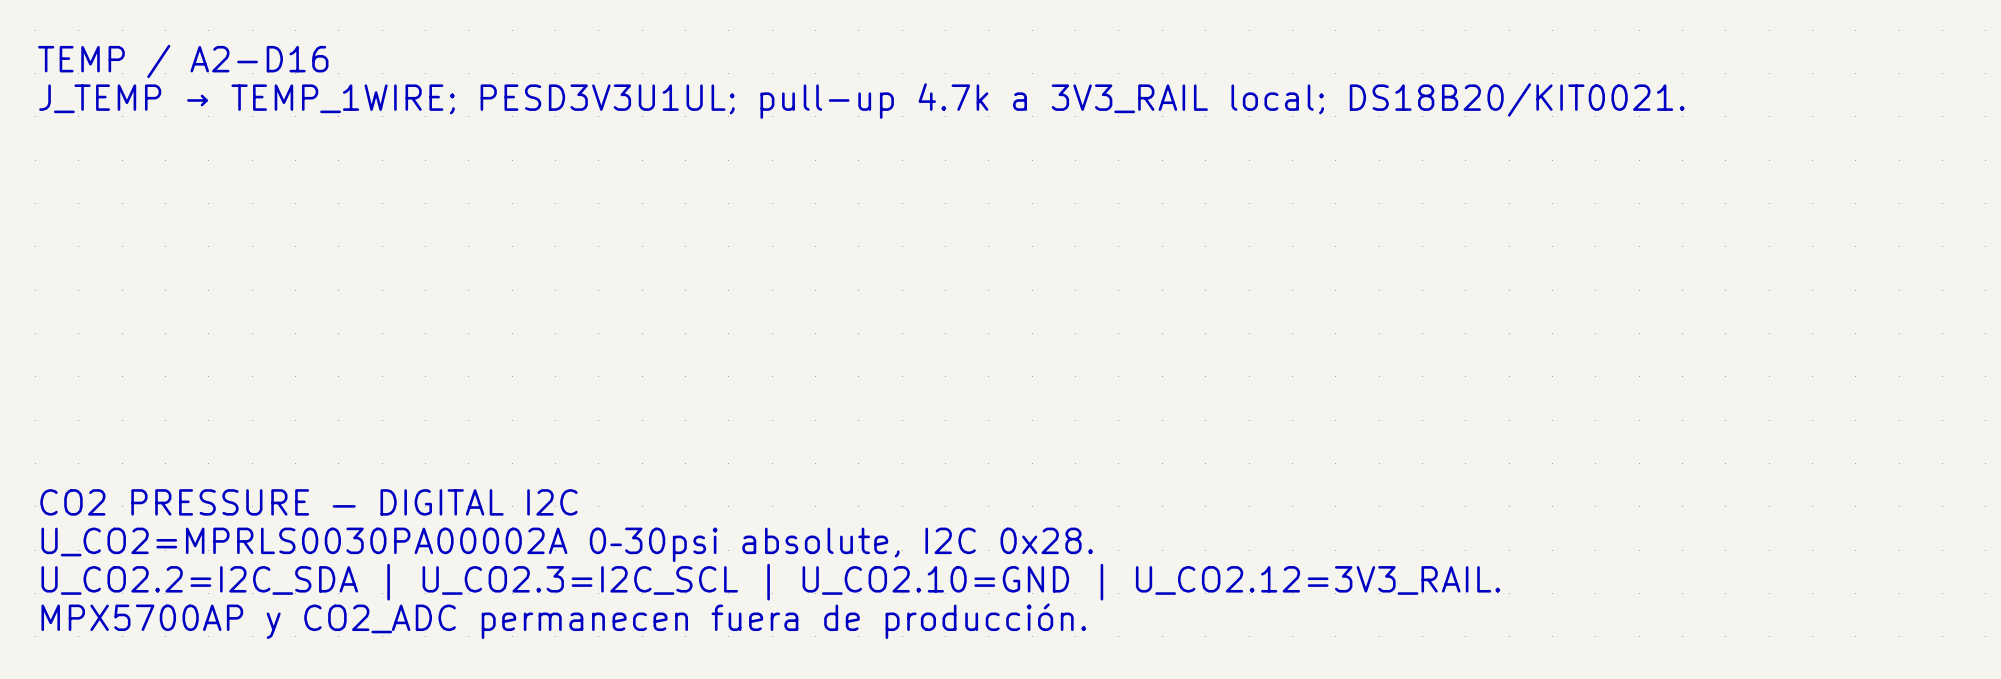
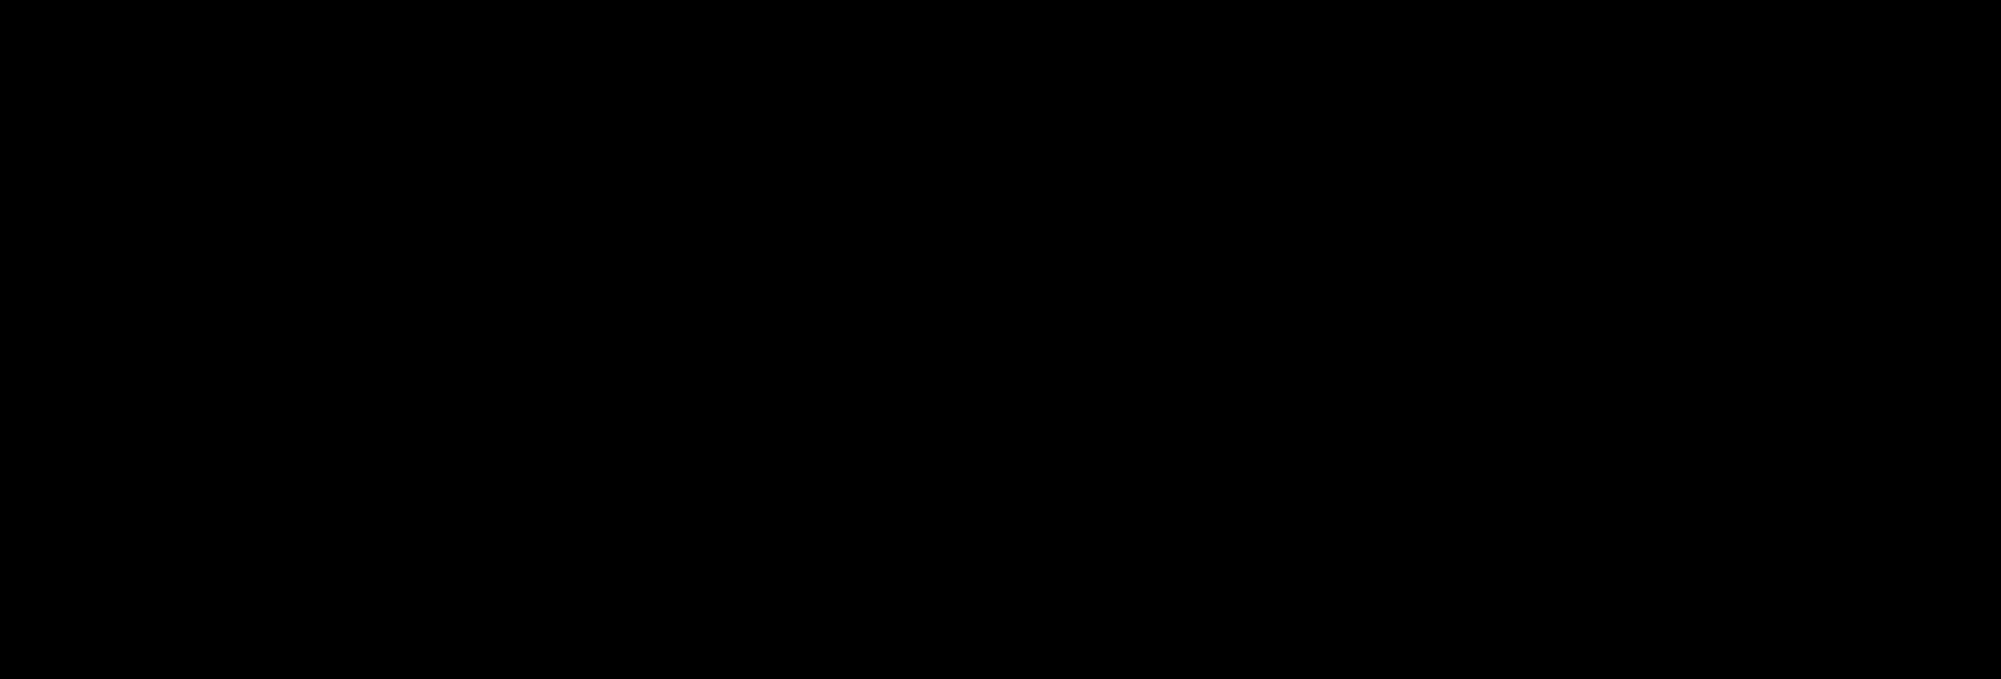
text: TEMP / A2-D16 (183, 61) -> none
text: J_TEMP → TEMP_1WIRE; PESD3V3U1UL; pull-up 4.7k a 3V3_RAIL local; DS18B20/KIT0021. (861, 101) -> none
text: CO2 PRESSURE — DIGITAL I2C (308, 502) -> none
text: U_CO2=MPRLS0030PA00002A 0–30psi absolute, I2C 0x28. (567, 544) -> none
text: U_CO2.2=I2C_SDA | U_CO2.3=I2C_SCL | U_CO2.10=GND | U_CO2.12=3V3_RAIL. (770, 582) -> none
text: MPX5700AP y CO2_ADC permanecen fuera de producción. (563, 621) -> none

